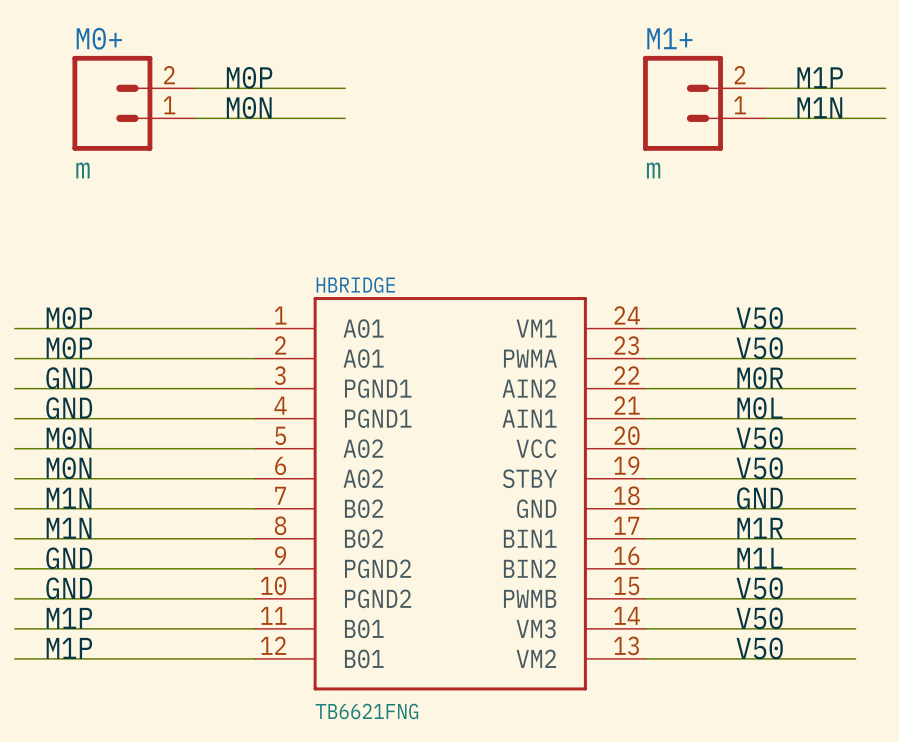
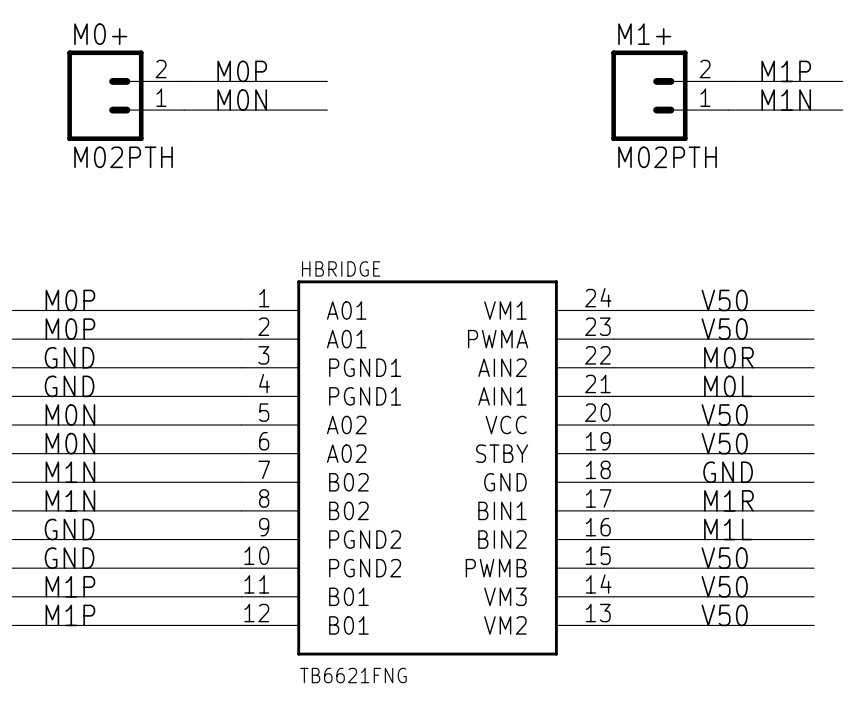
M0+ value: m (83, 170) -> M02PTH (123, 157)
M1+ value: m (653, 170) -> M02PTH (667, 157)

